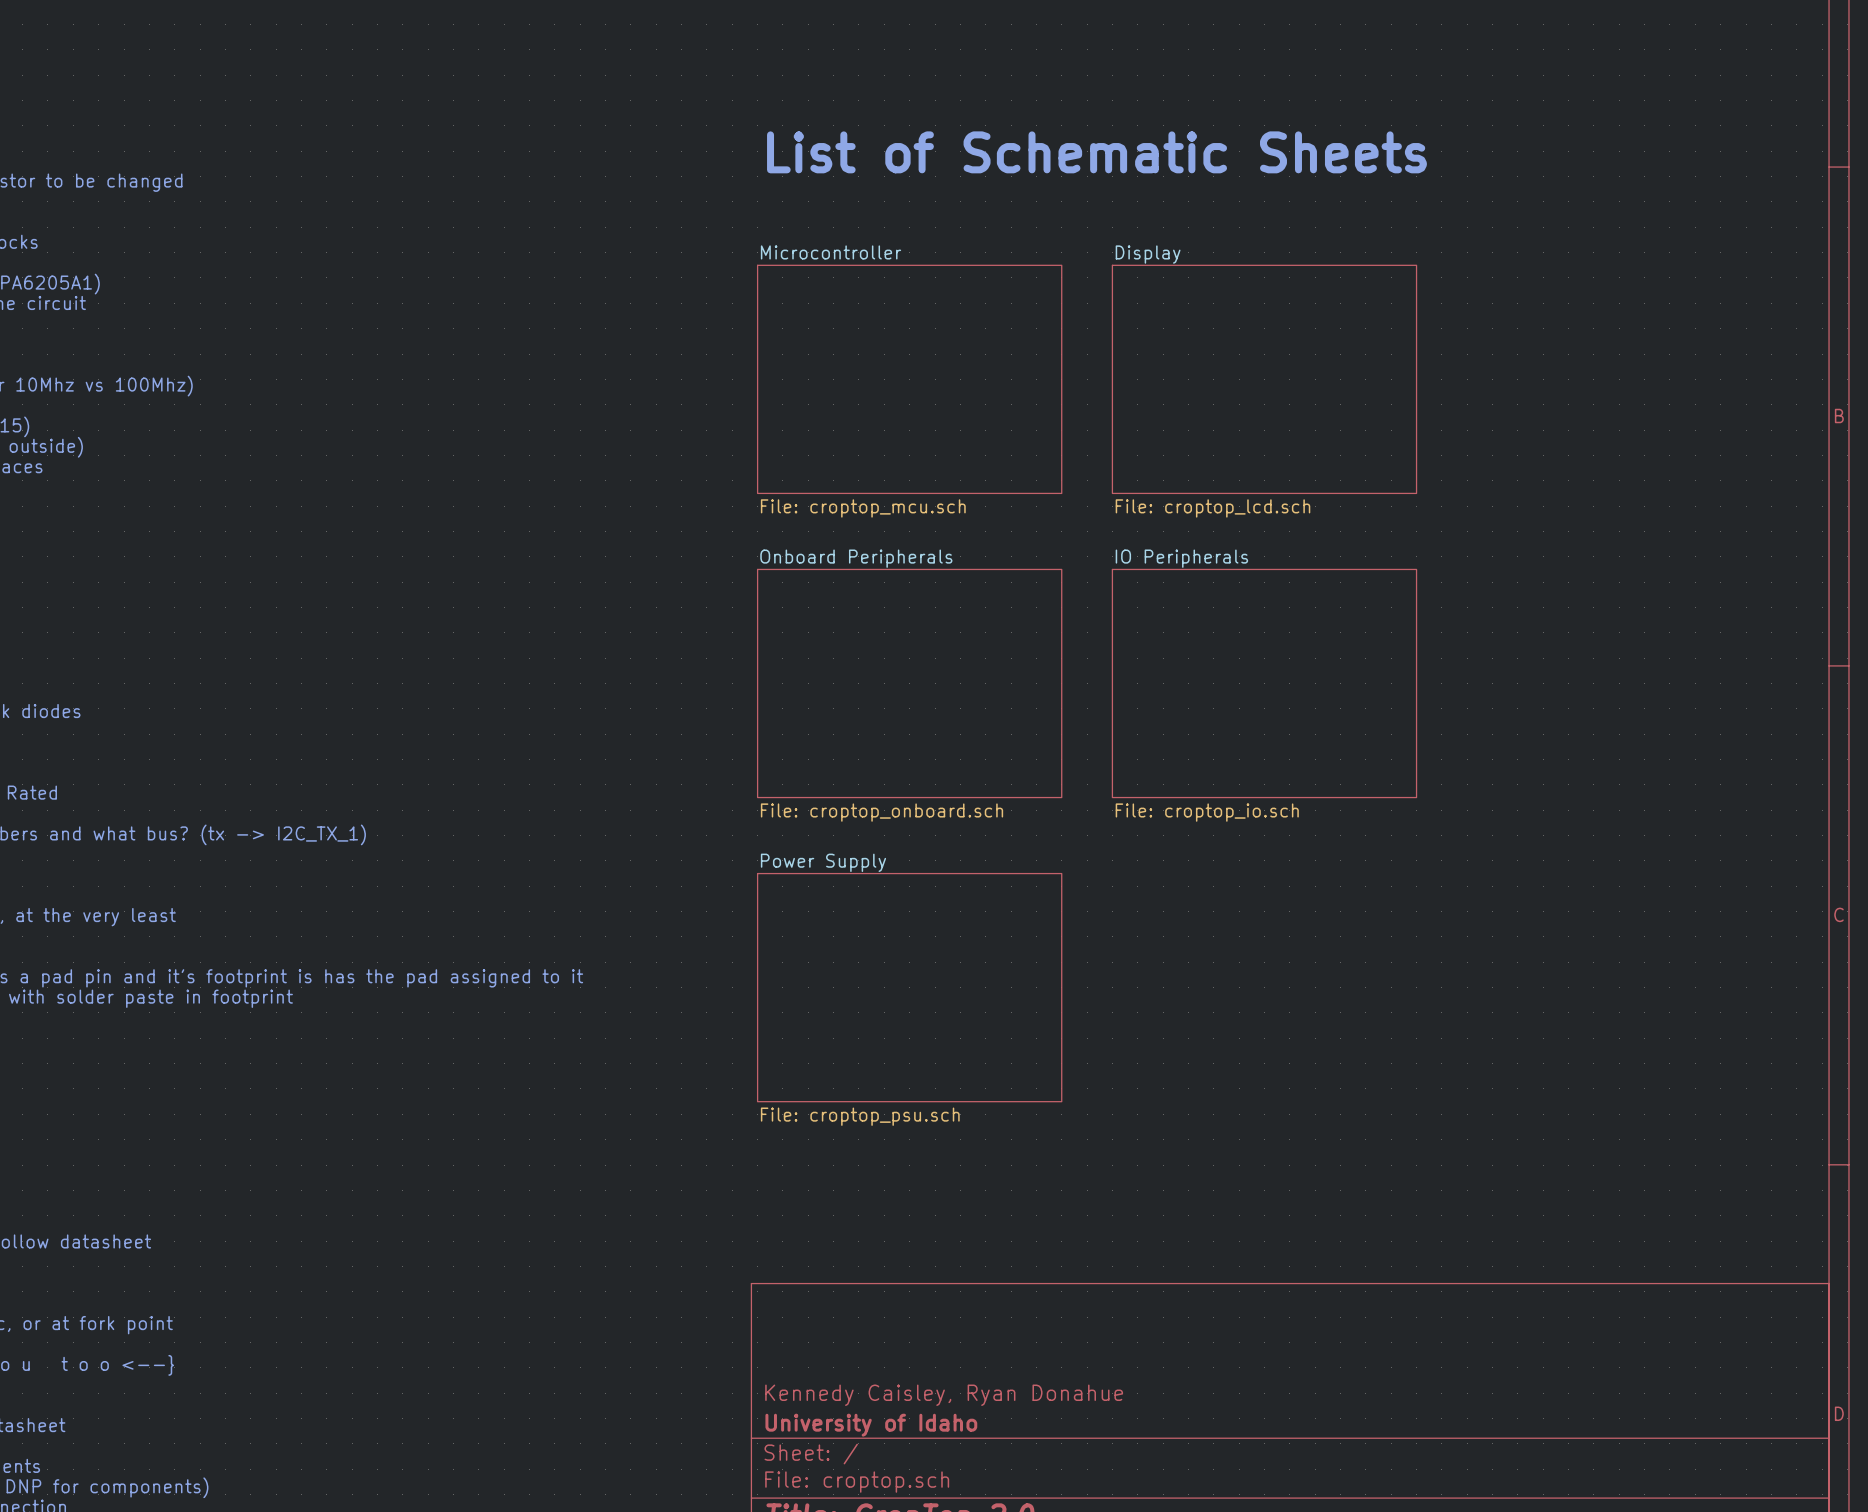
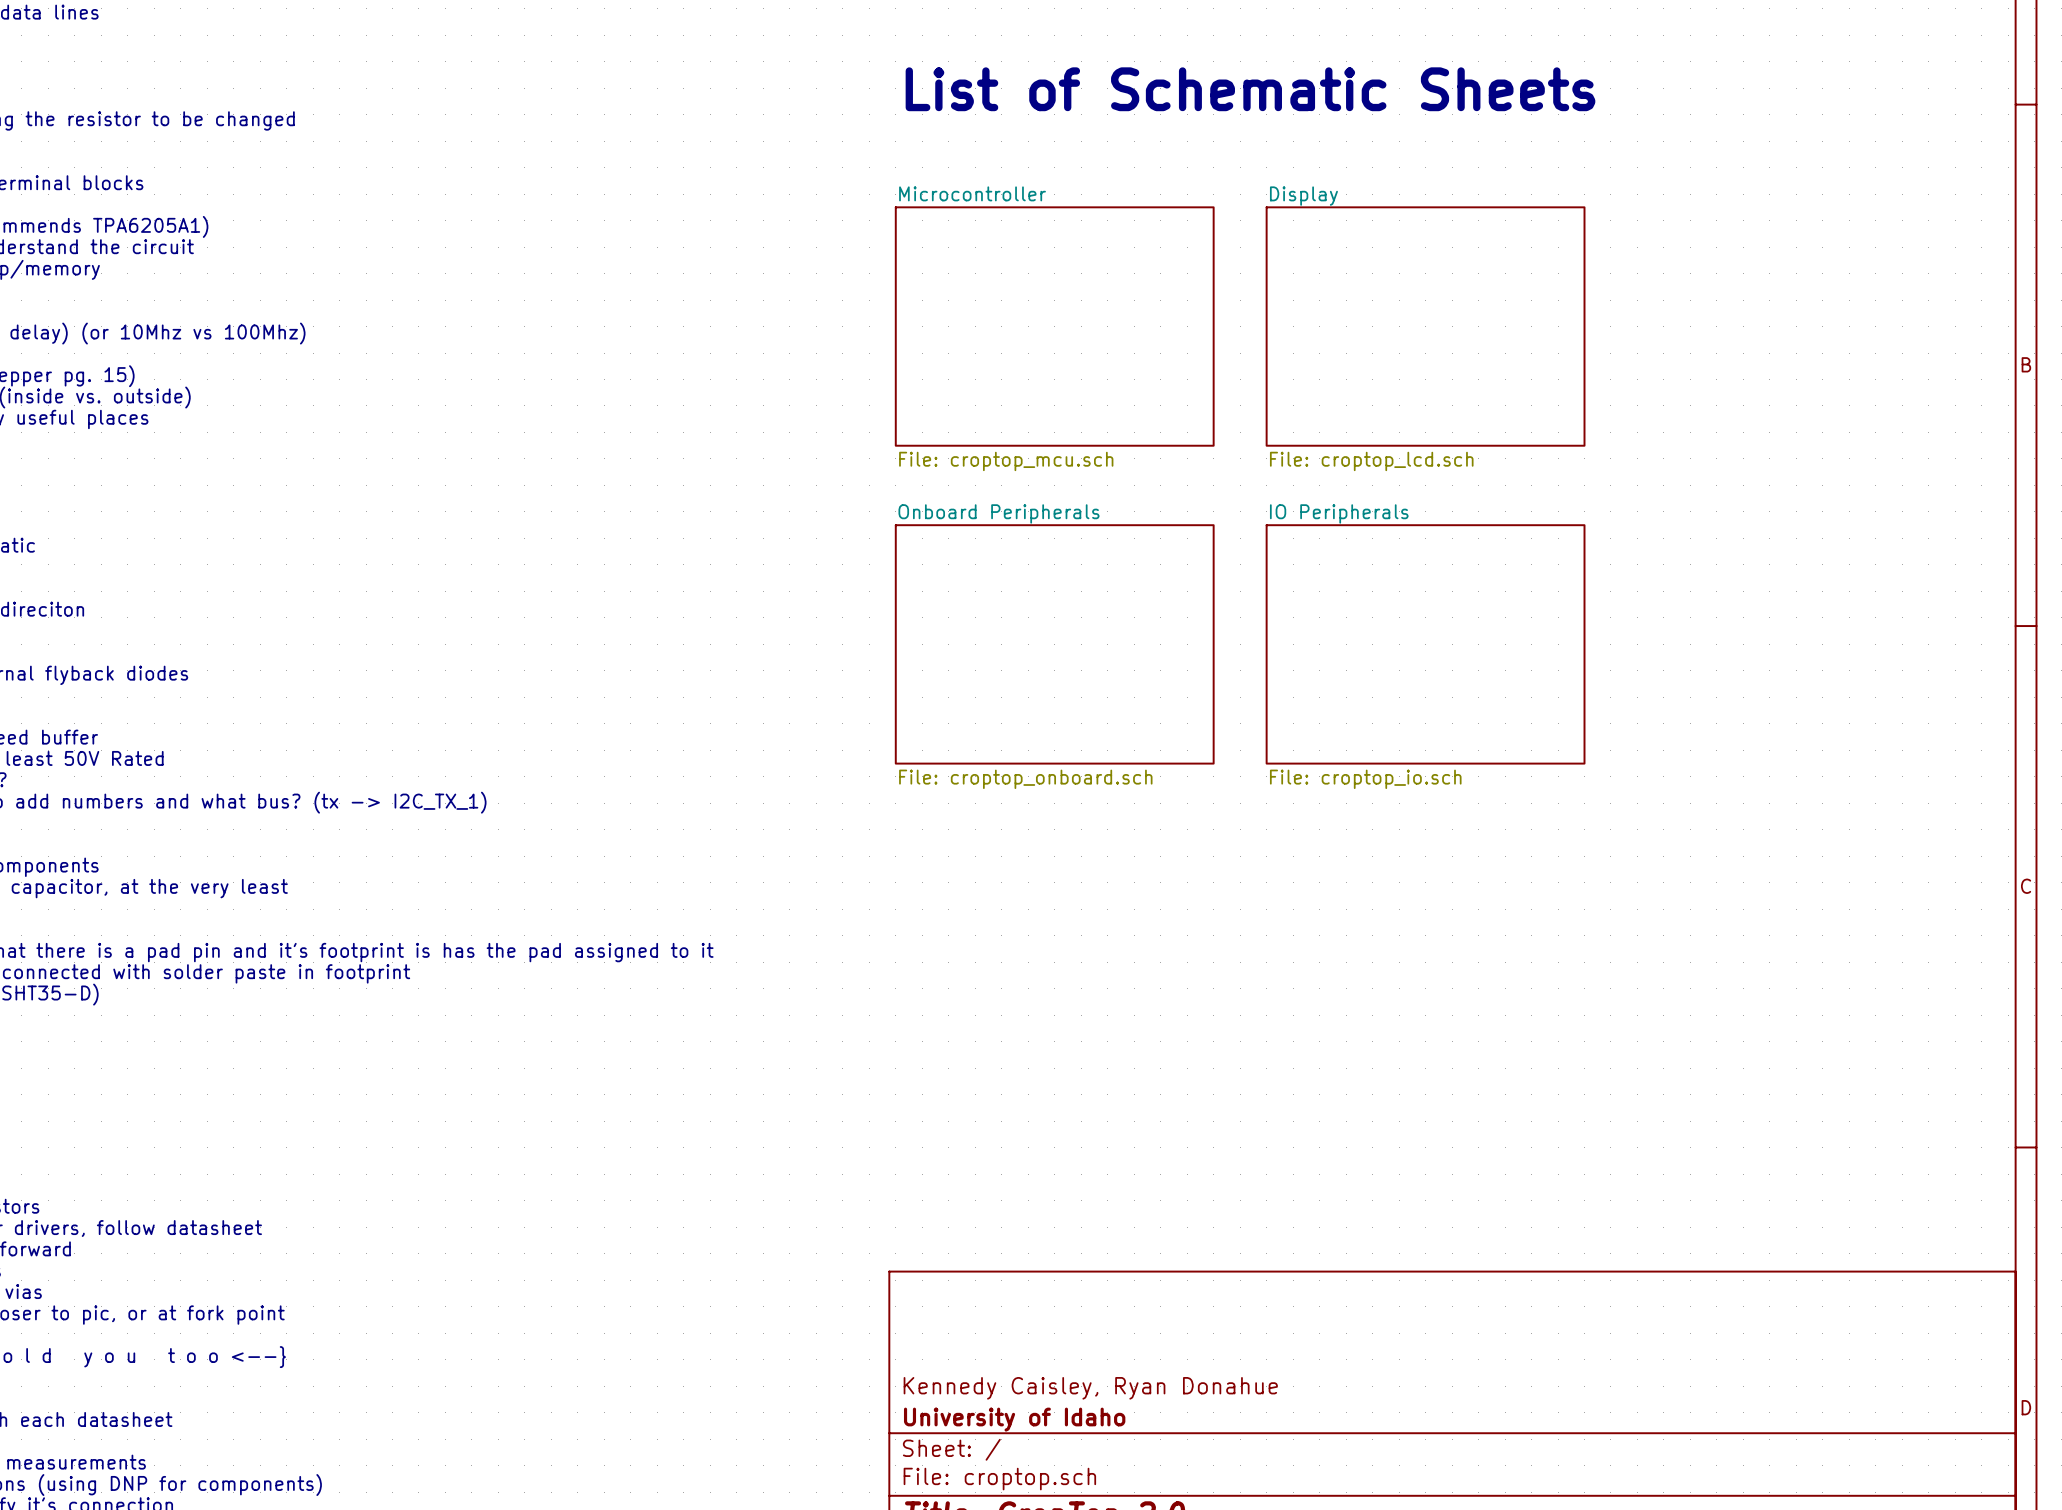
sheet Power Supply: File: croptop_psu.sch (909, 987) -> none

